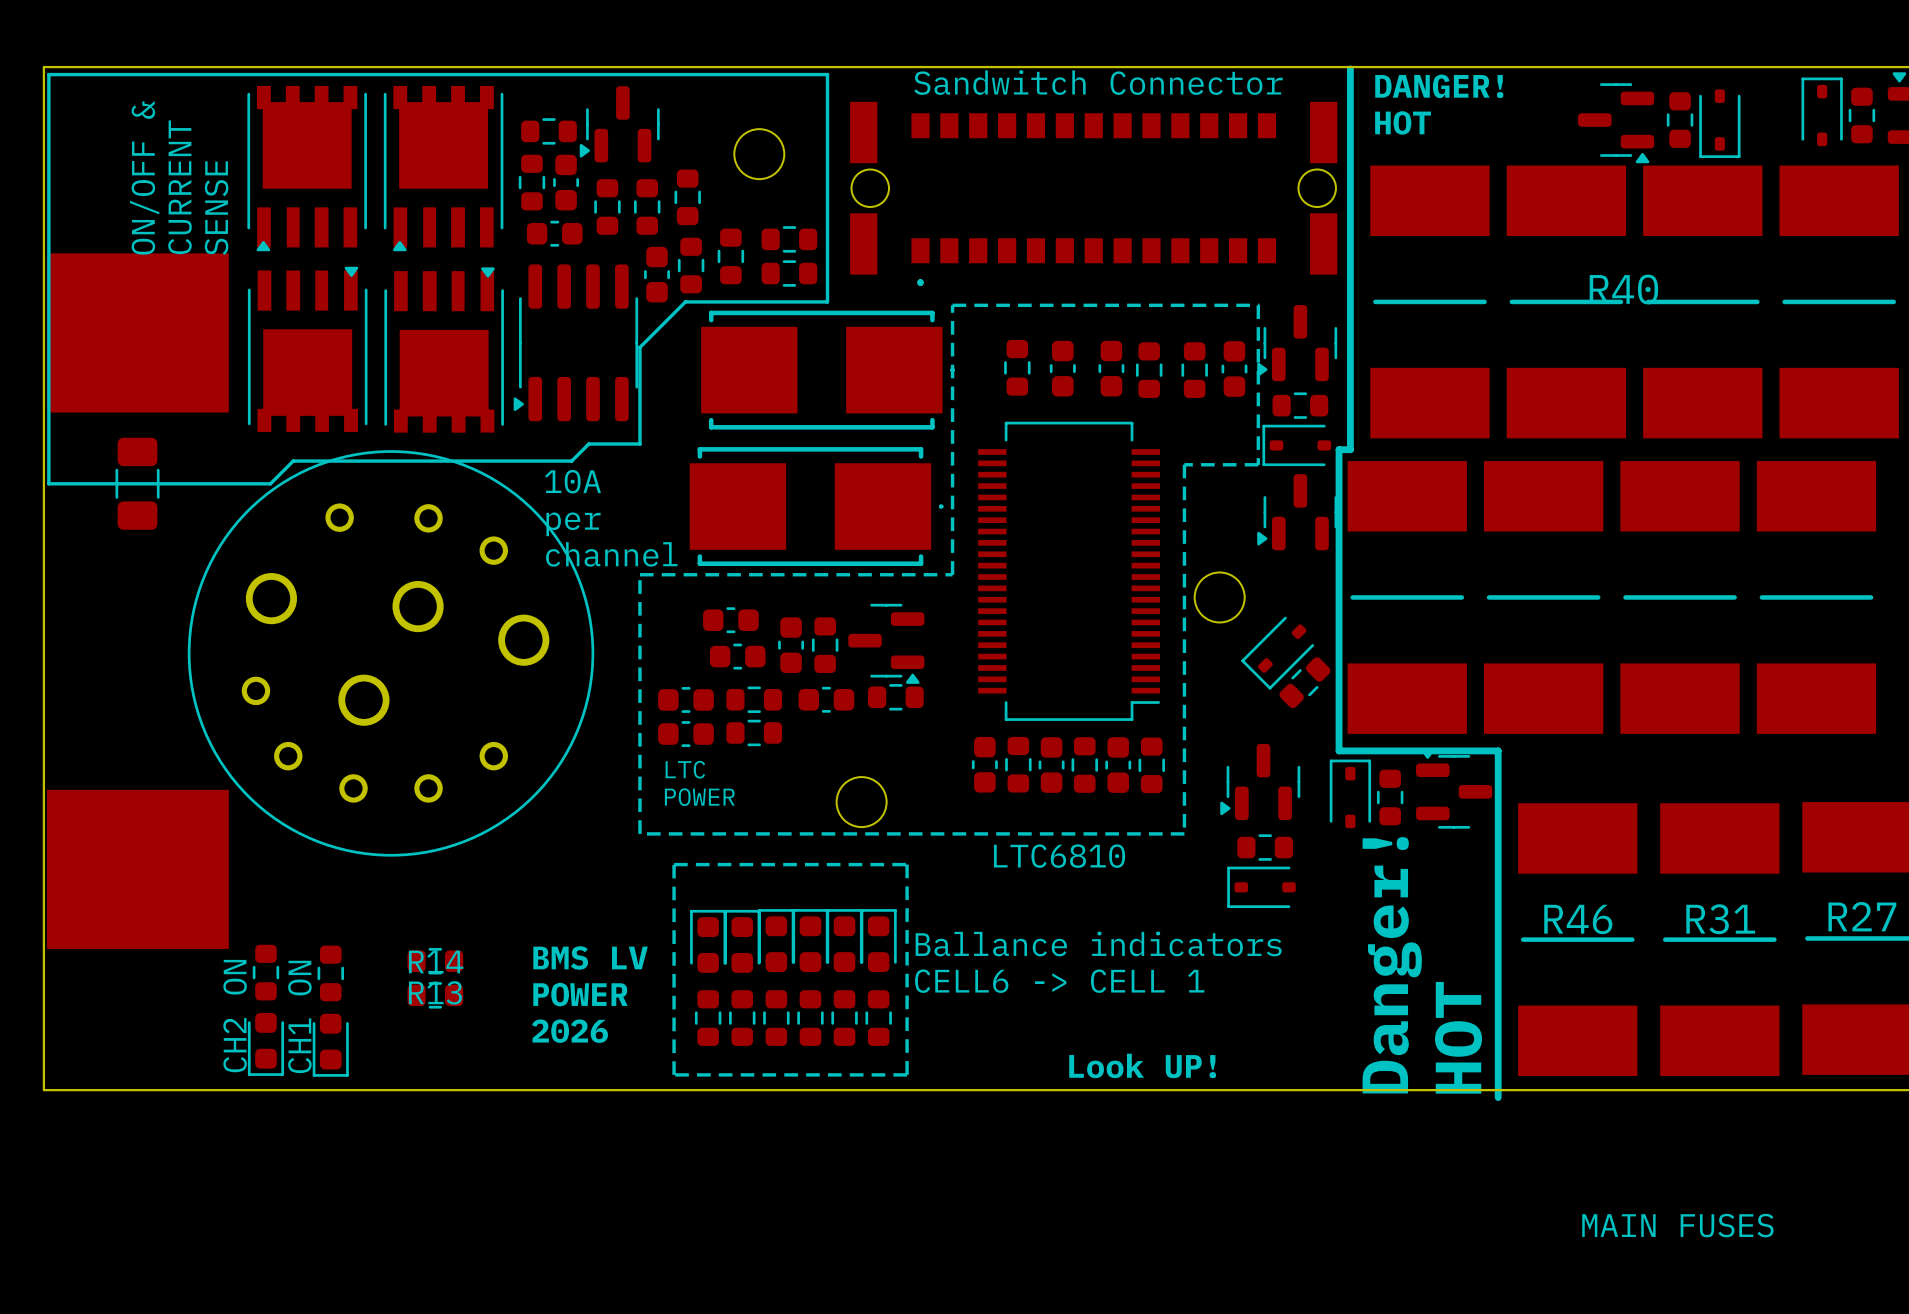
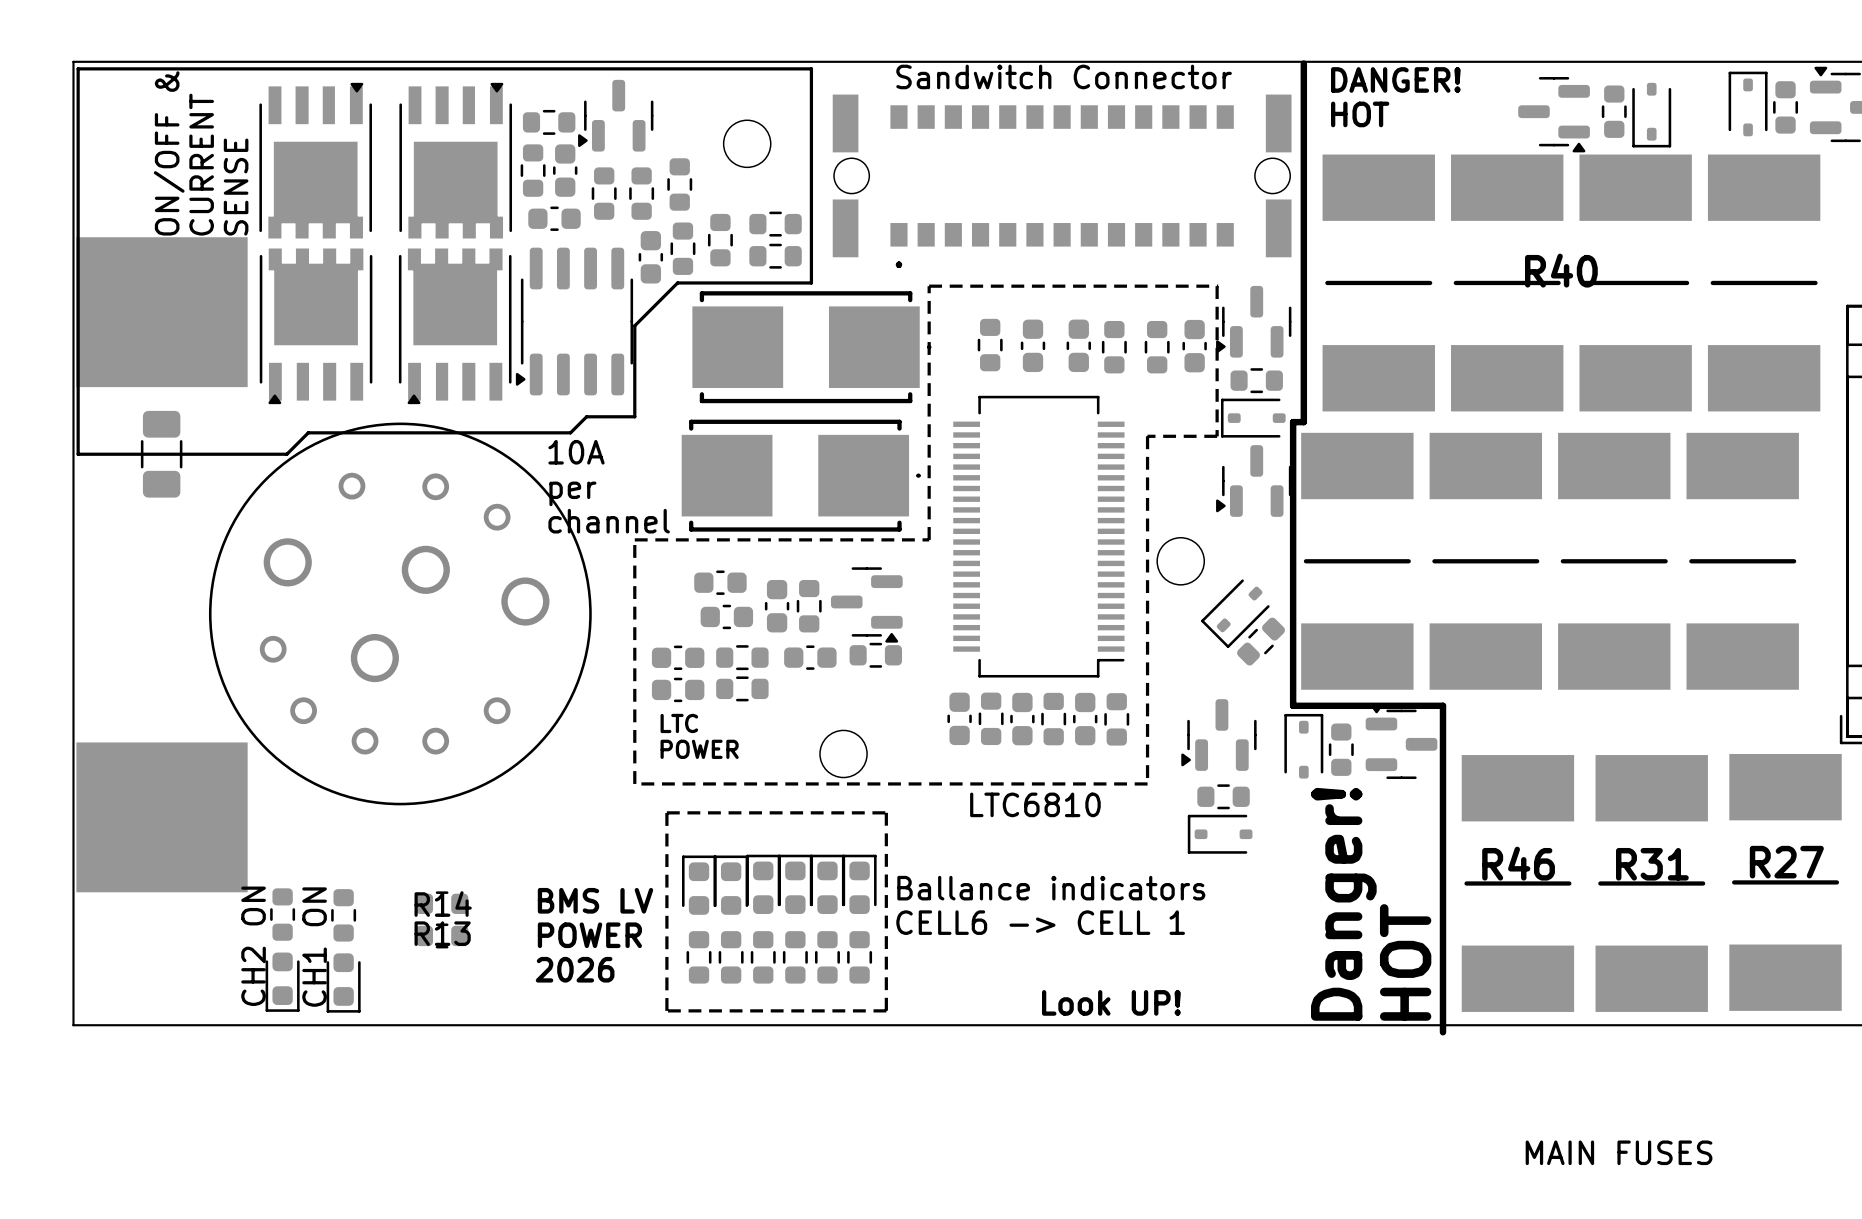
part rotation: 0° (307, 168) -> 180° (315, 160)
part rotation: 0° (443, 168) -> 180° (455, 160)
part rotation: 0° (307, 349) -> 180° (316, 326)
part rotation: 0° (444, 350) -> 180° (455, 326)

